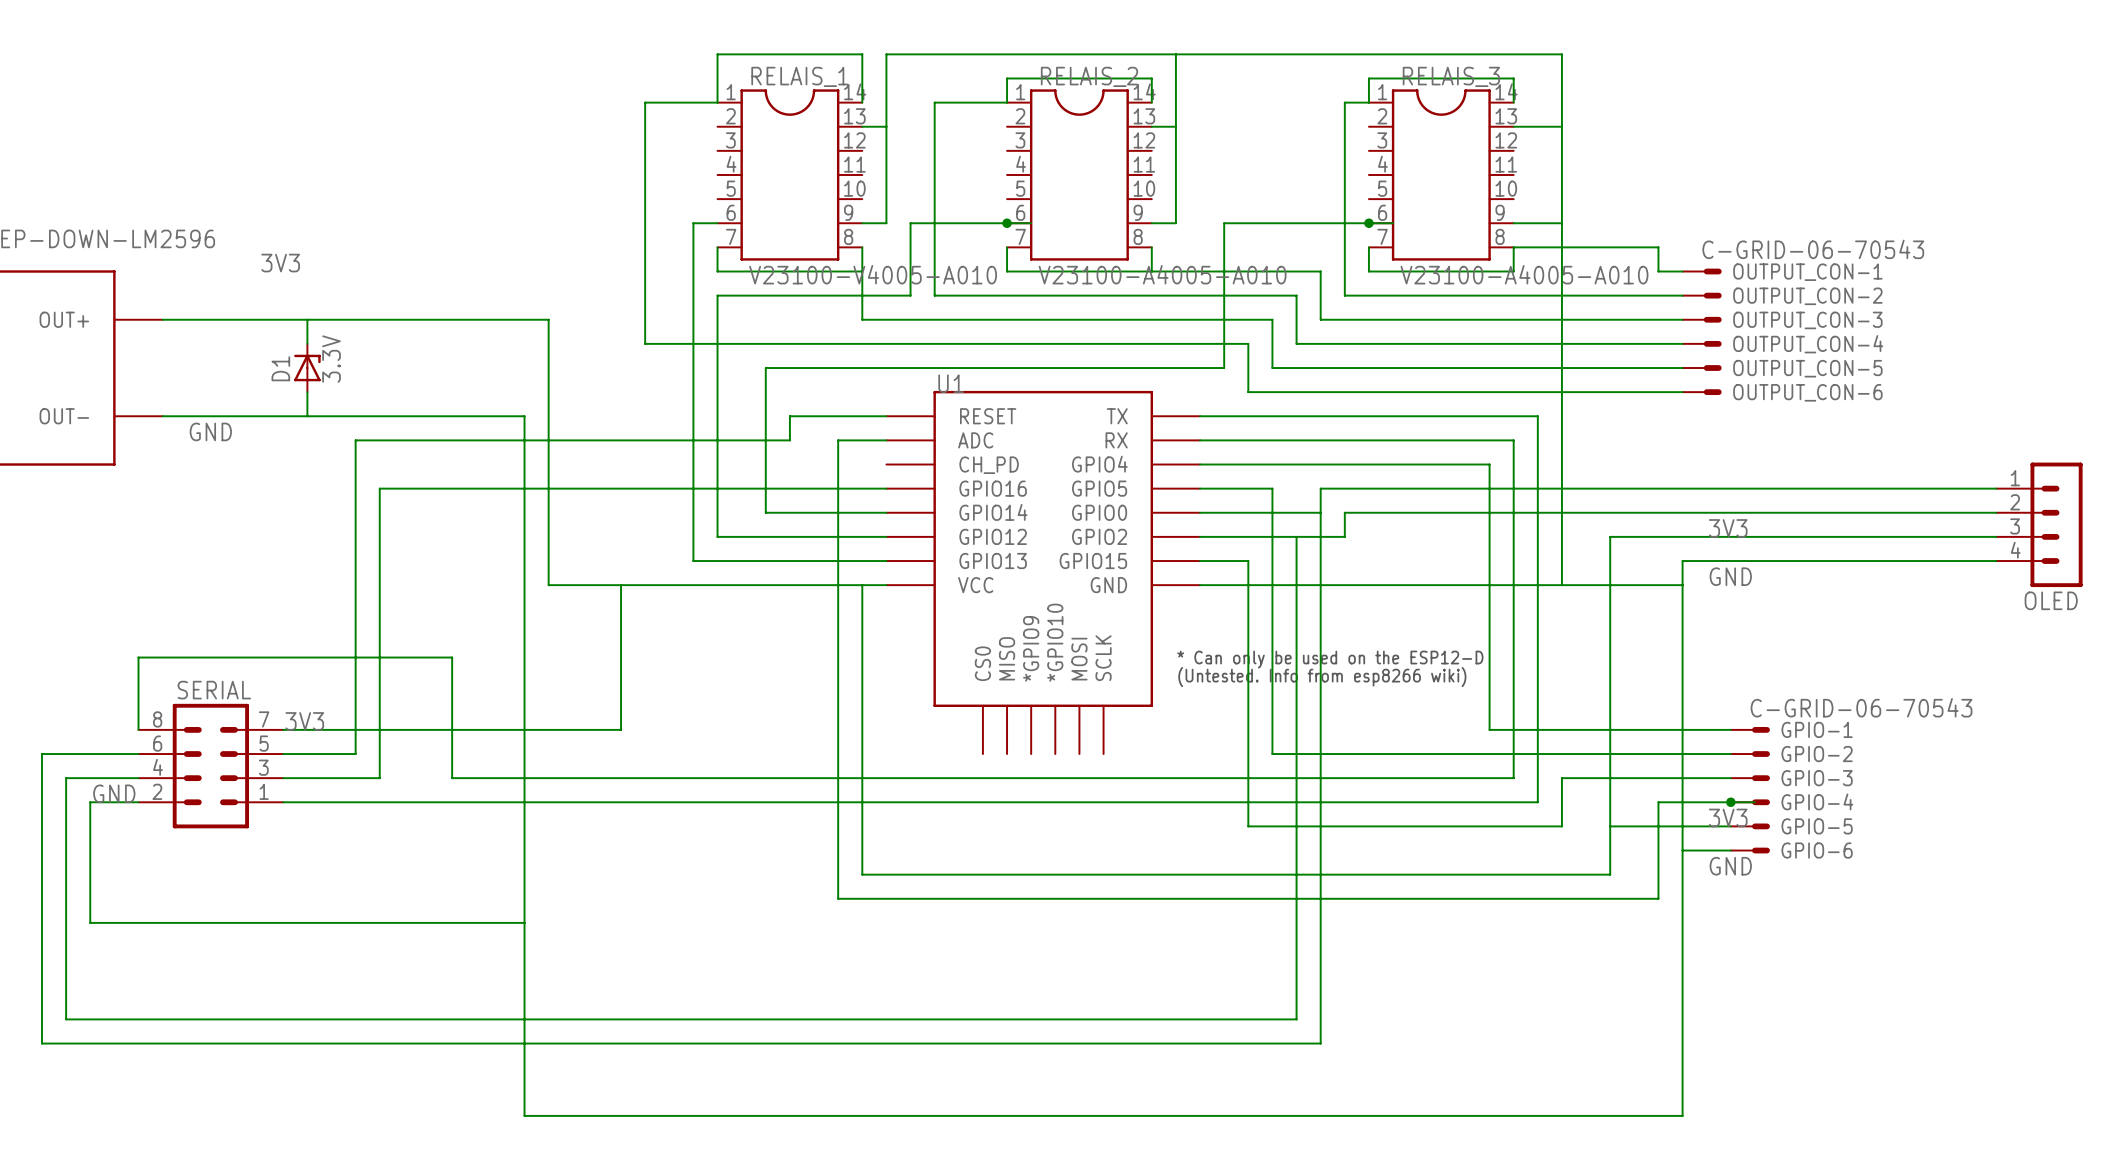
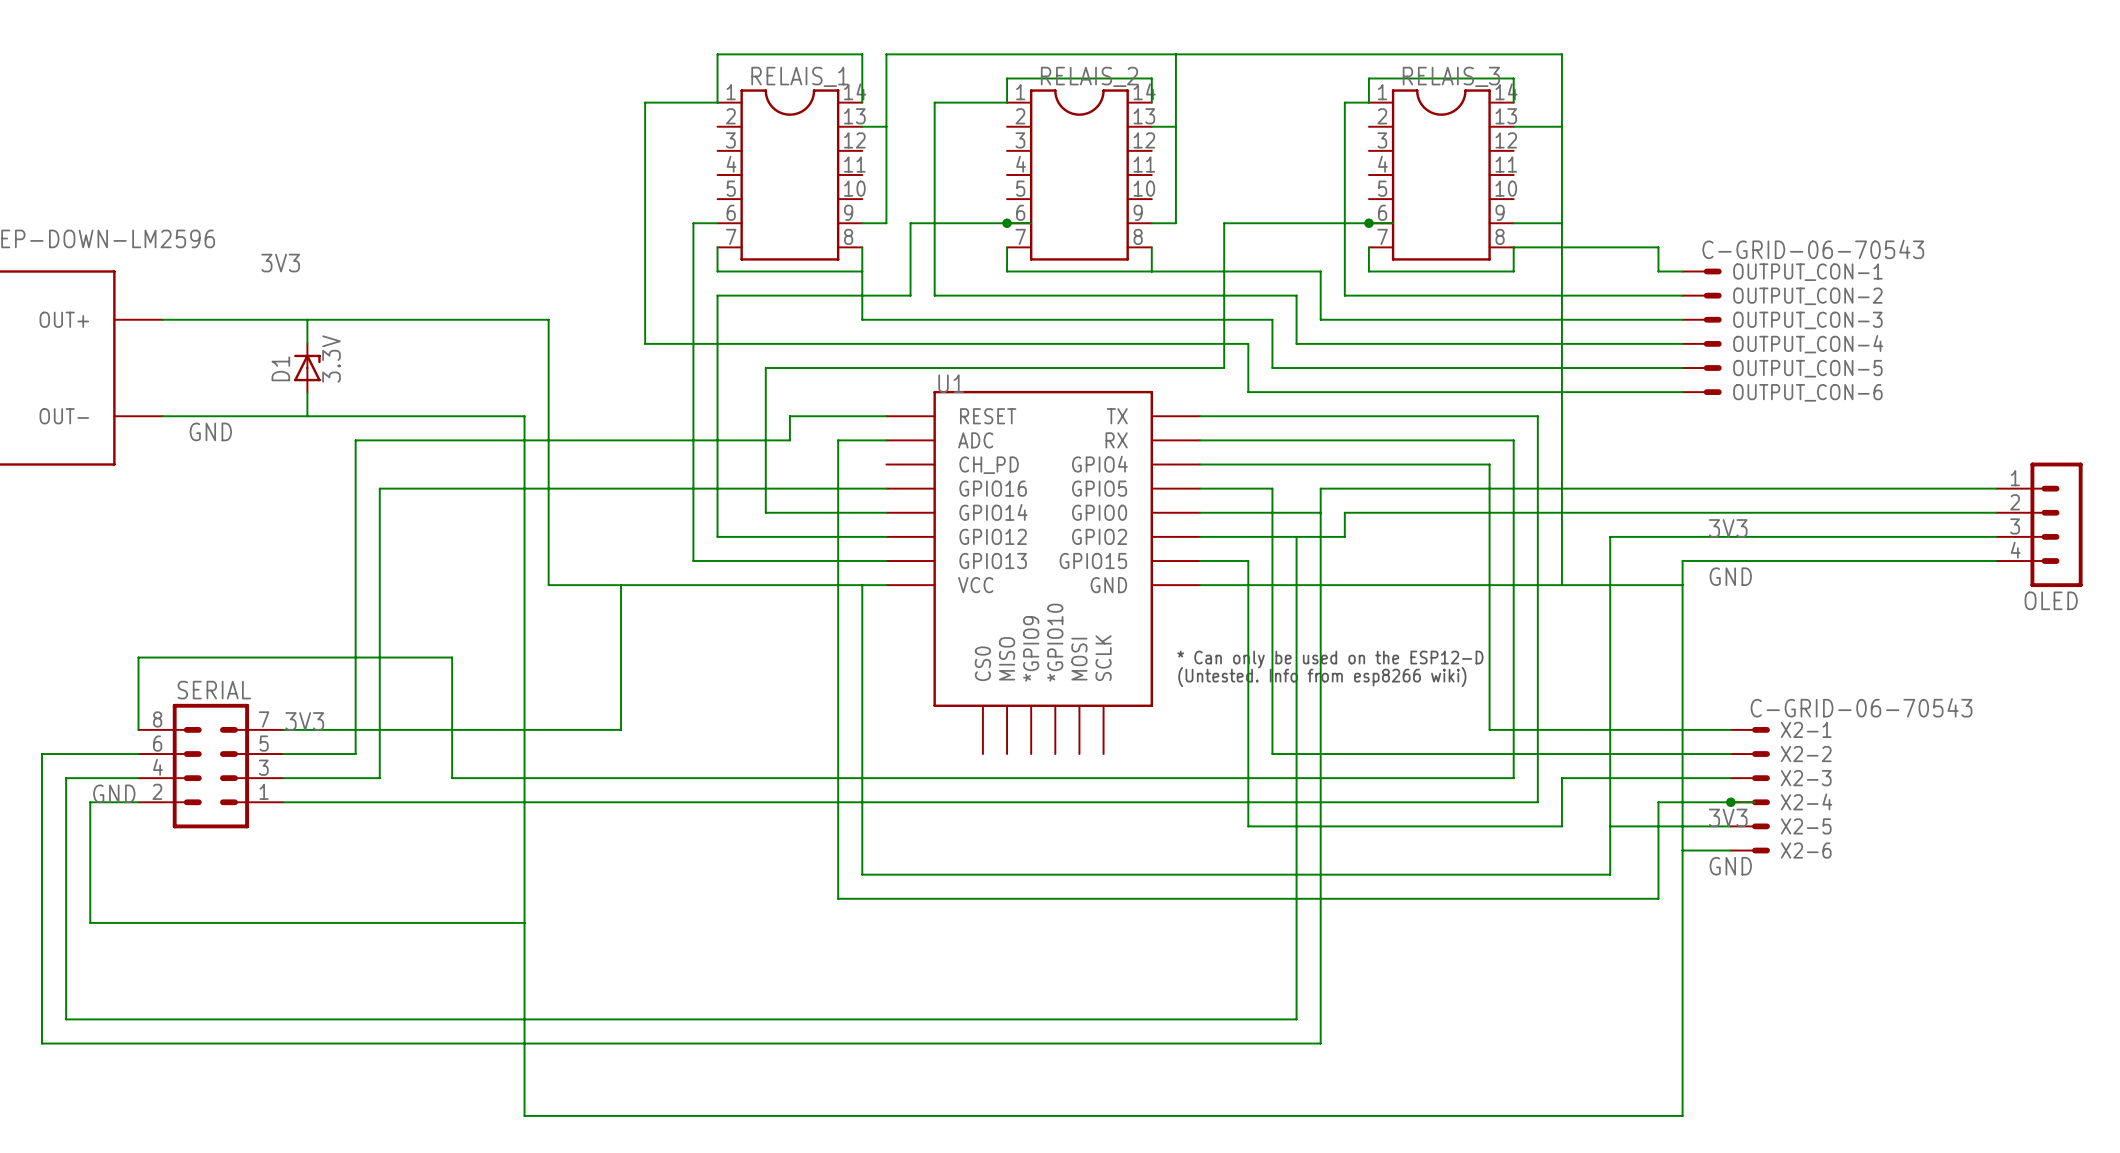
RELAIS_1 value: V23100-V4005-A010 (873, 274) -> none
RELAIS_2 value: V23100-A4005-A010 (1162, 274) -> none
RELAIS_3 value: V23100-A4005-A010 (1524, 274) -> none
GPIO-1 name: GPIO-1 (1817, 729) -> X2-1 (1806, 729)
GPIO-2 name: GPIO-2 (1817, 754) -> X2-2 (1806, 754)
GPIO-3 name: GPIO-3 (1817, 778) -> X2-3 (1806, 778)
GPIO-4 name: GPIO-4 (1817, 801) -> X2-4 (1806, 801)
GPIO-5 name: GPIO-5 (1817, 826) -> X2-5 (1806, 826)
GPIO-6 name: GPIO-6 (1817, 850) -> X2-6 (1806, 850)

